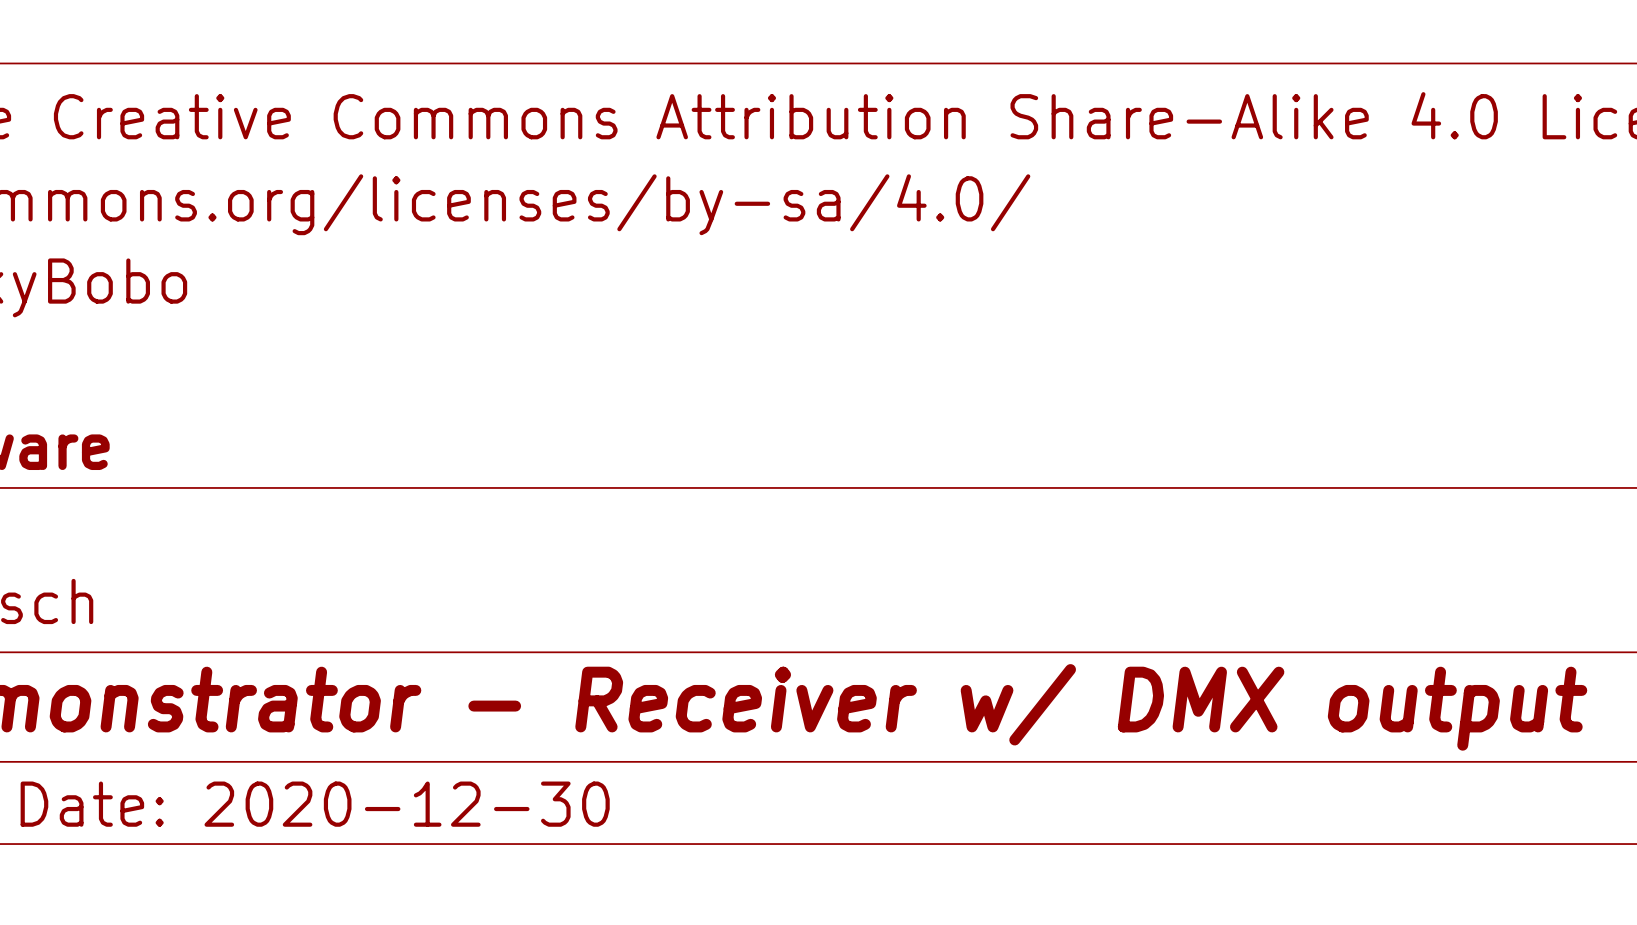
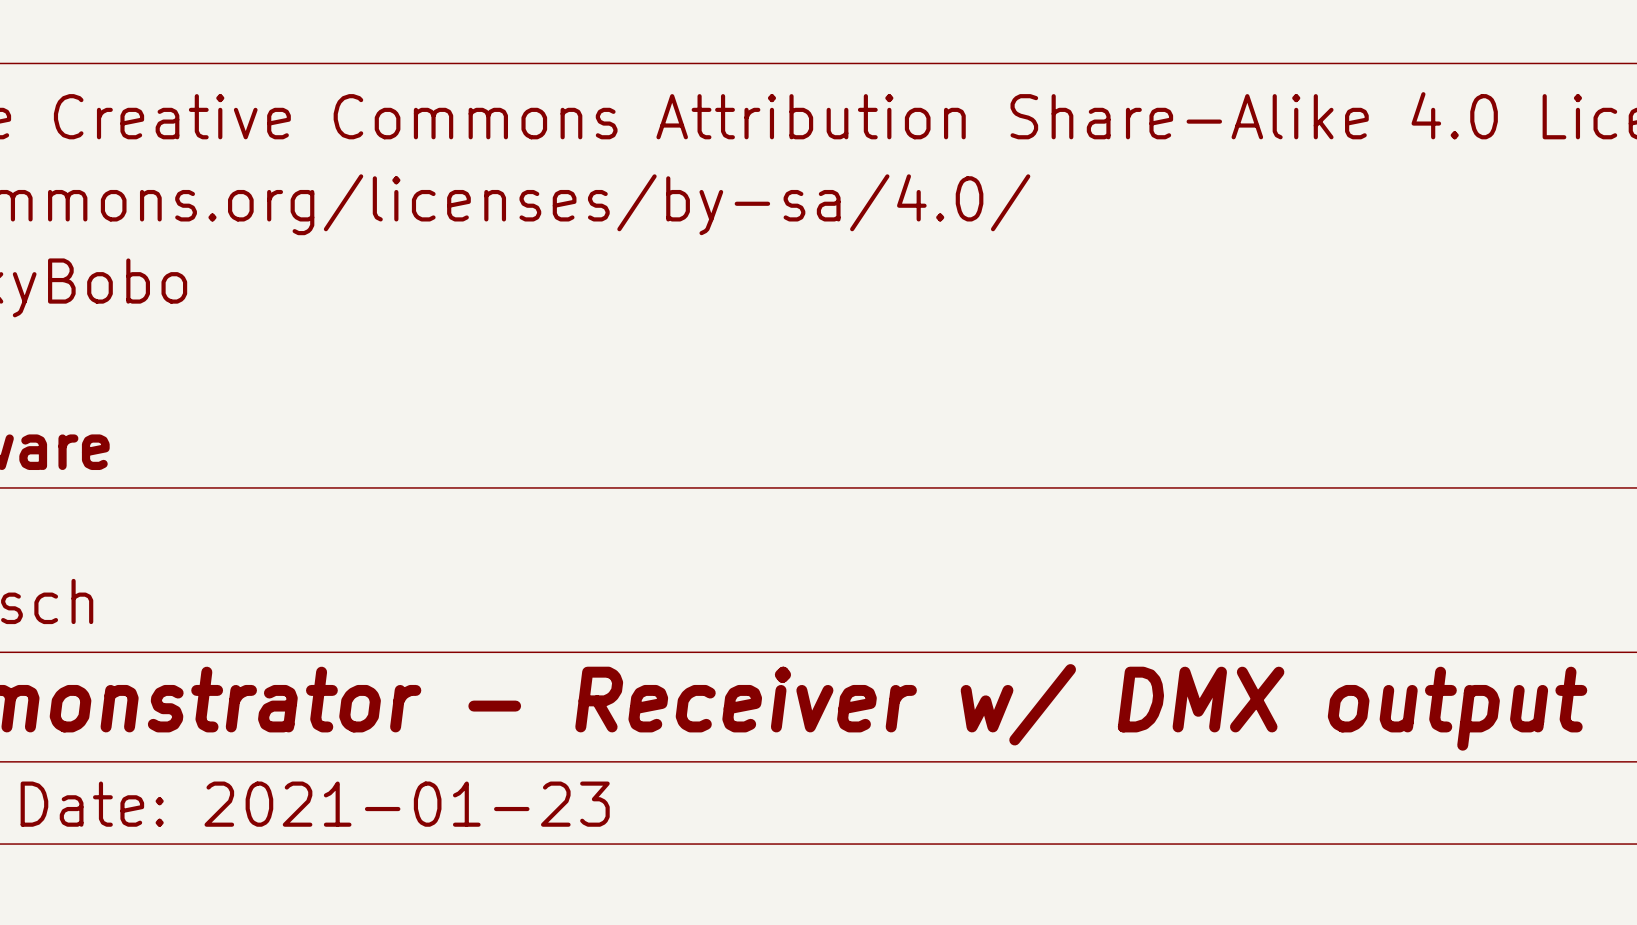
title block: Date: 2020-12-30 (315, 804) -> Date: 2021-01-23 (315, 804)

